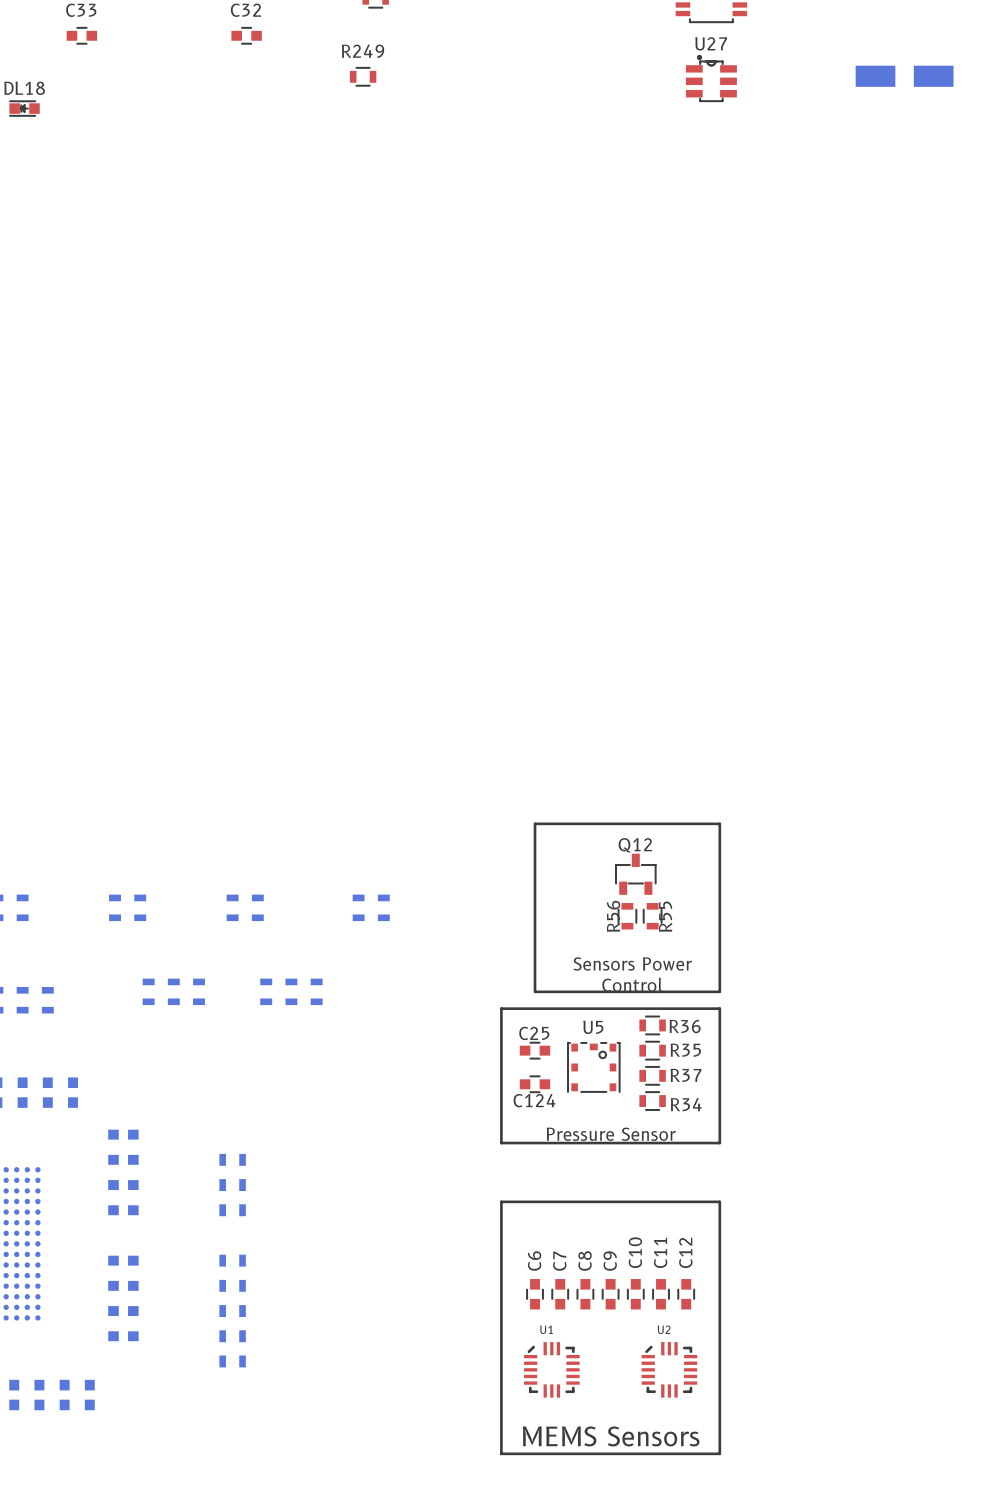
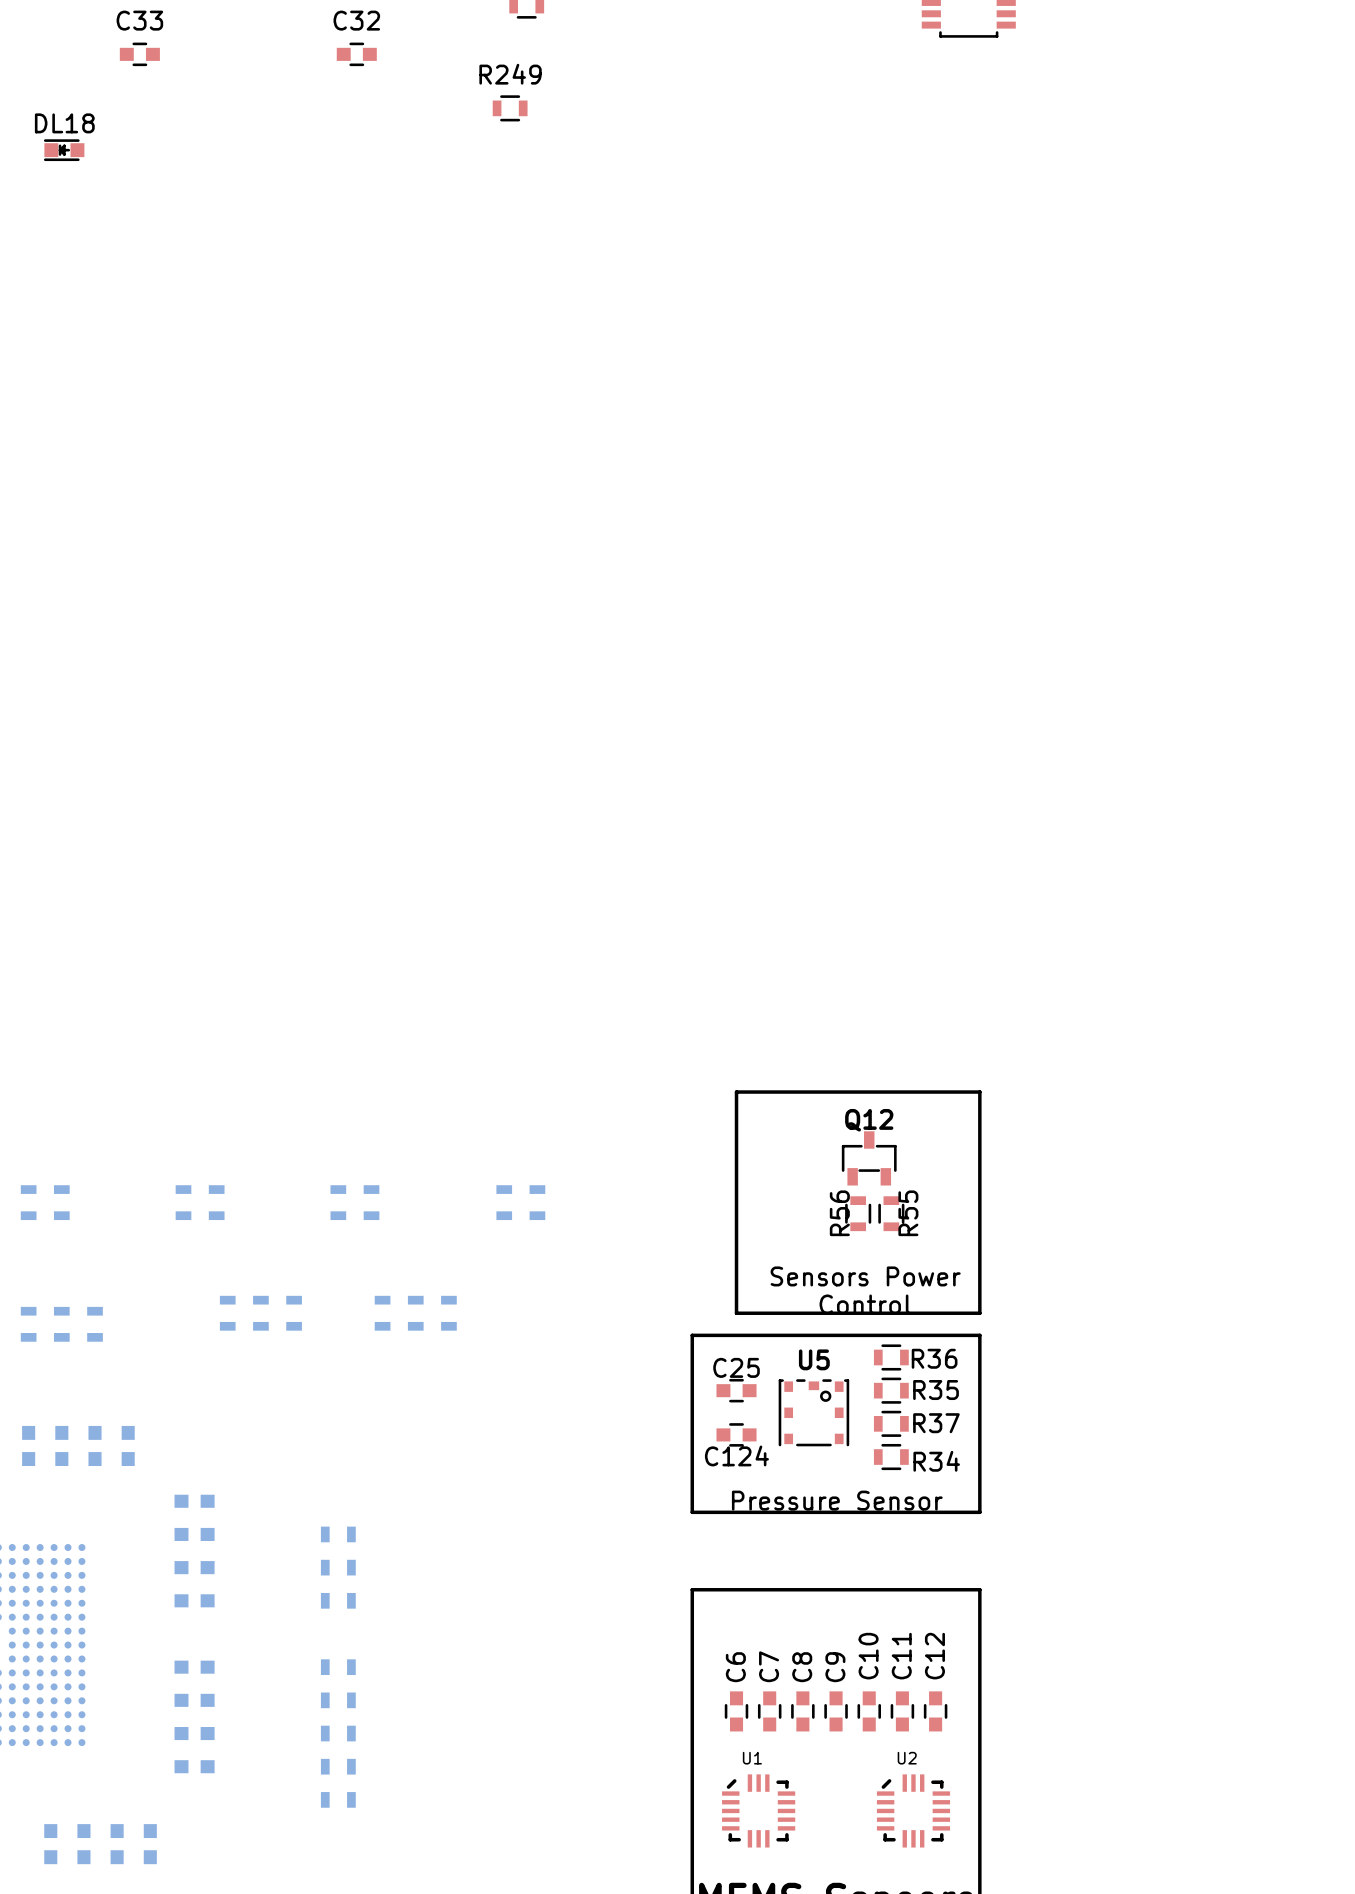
part: (904, 76) -> none
U27: (711, 78) -> none

